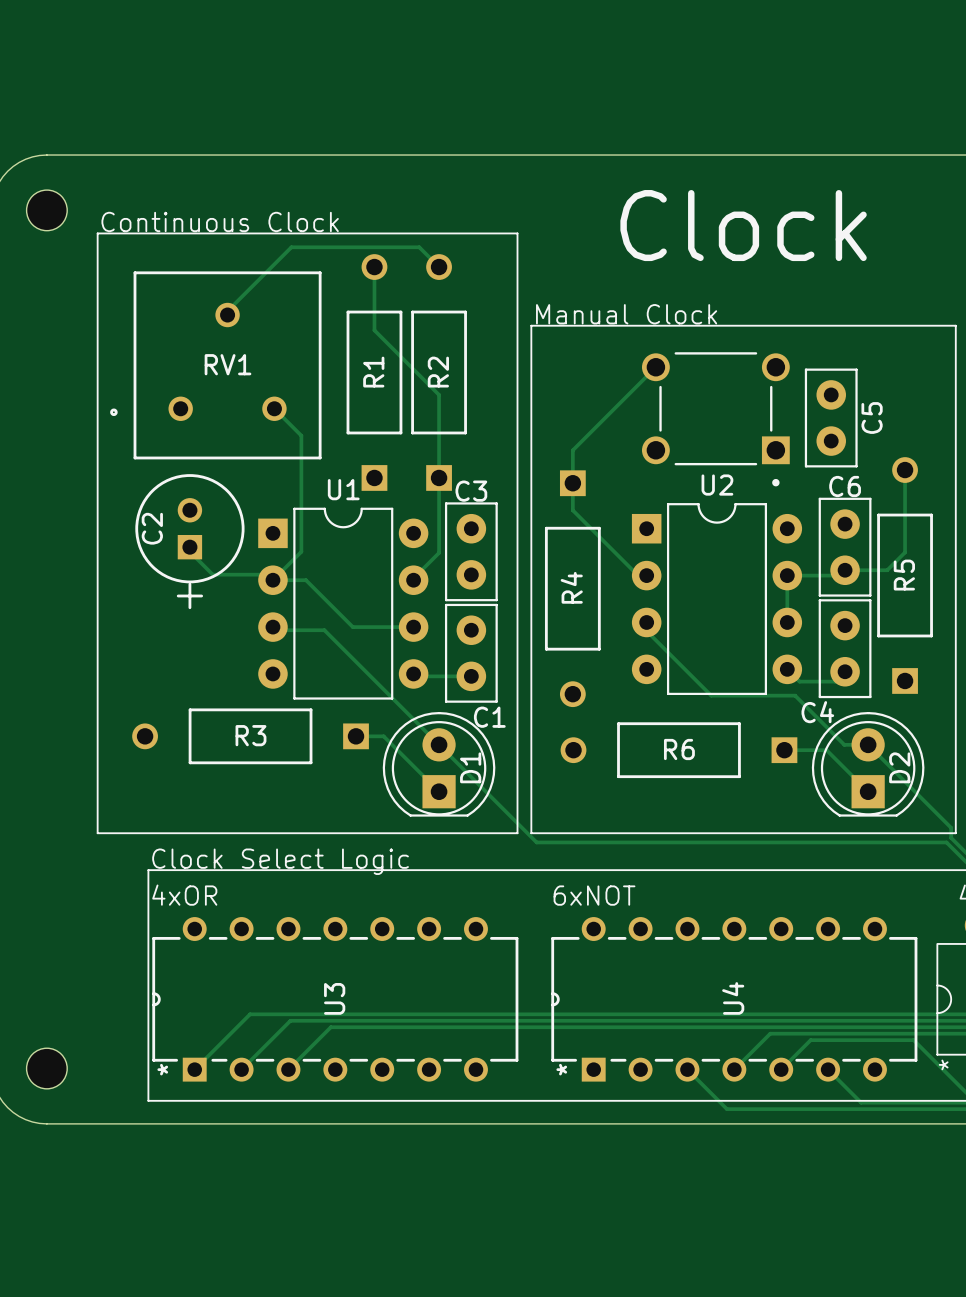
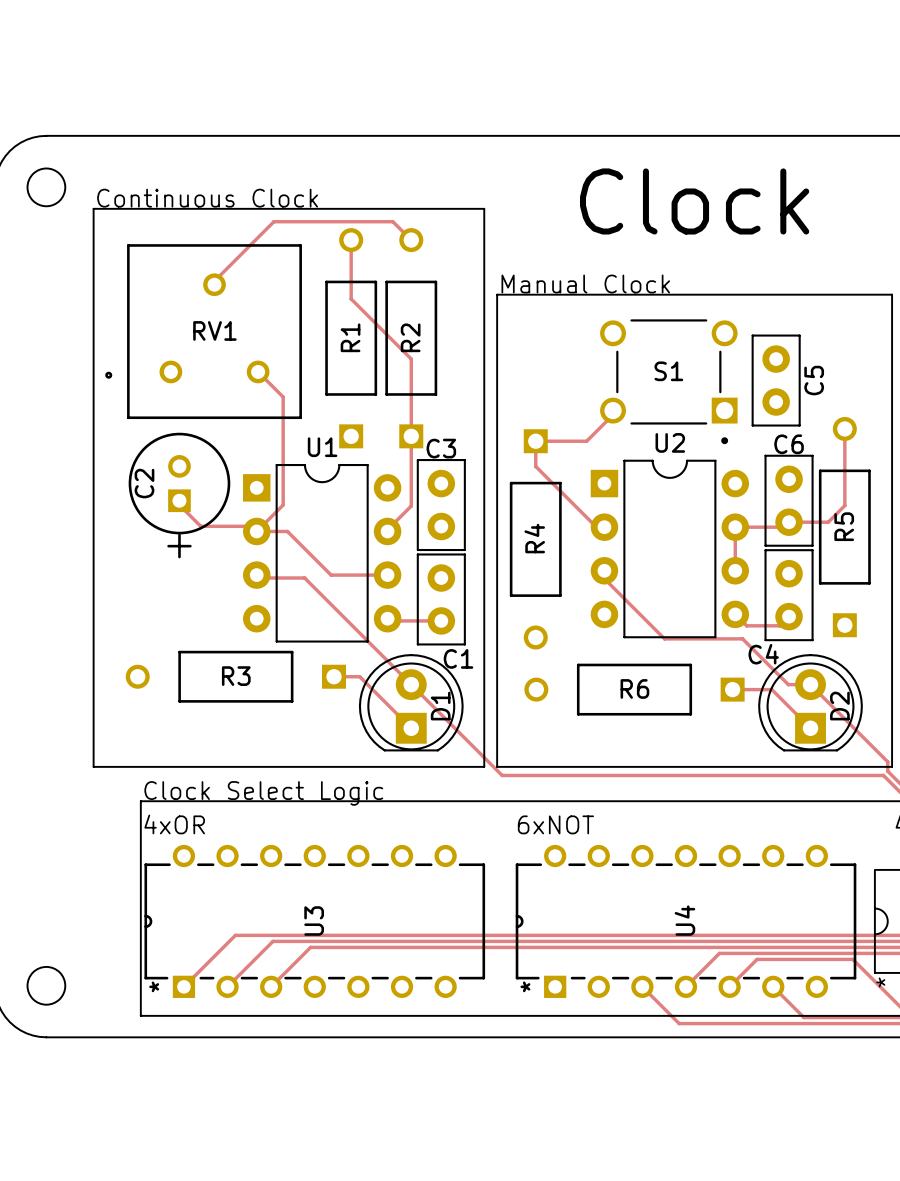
track: (655, 367) (572, 450) (572, 483) -> (617, 410) (586, 441) (535, 441)
S1 name: none -> S1 (668, 371)

